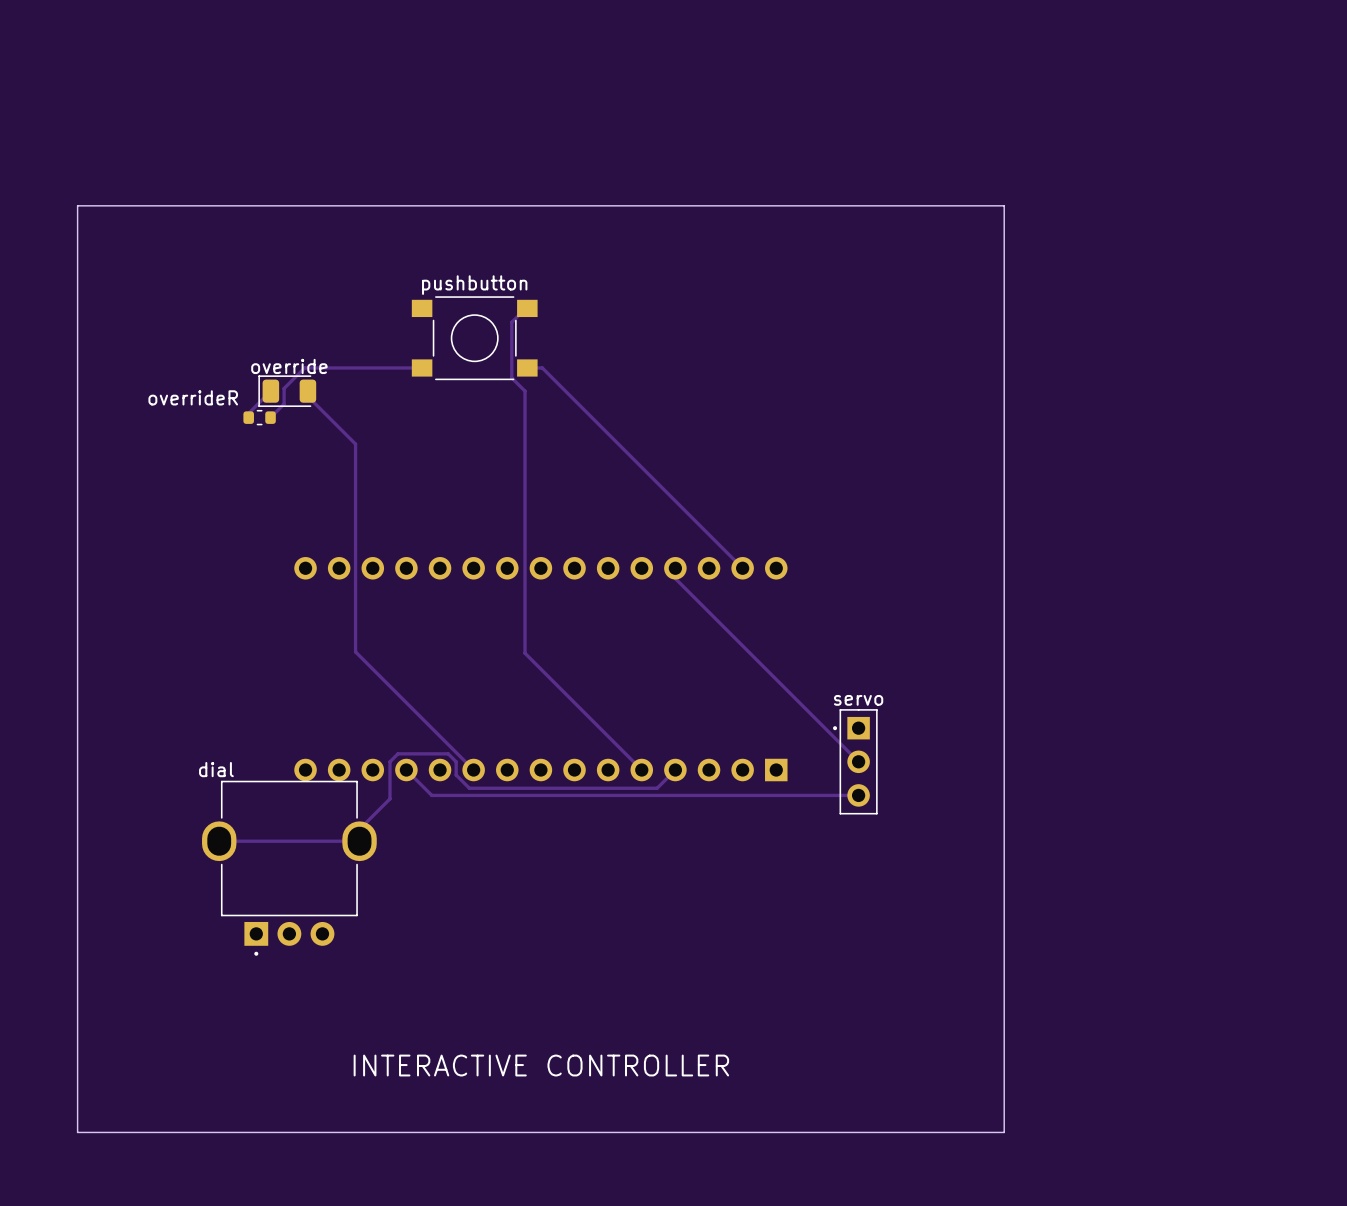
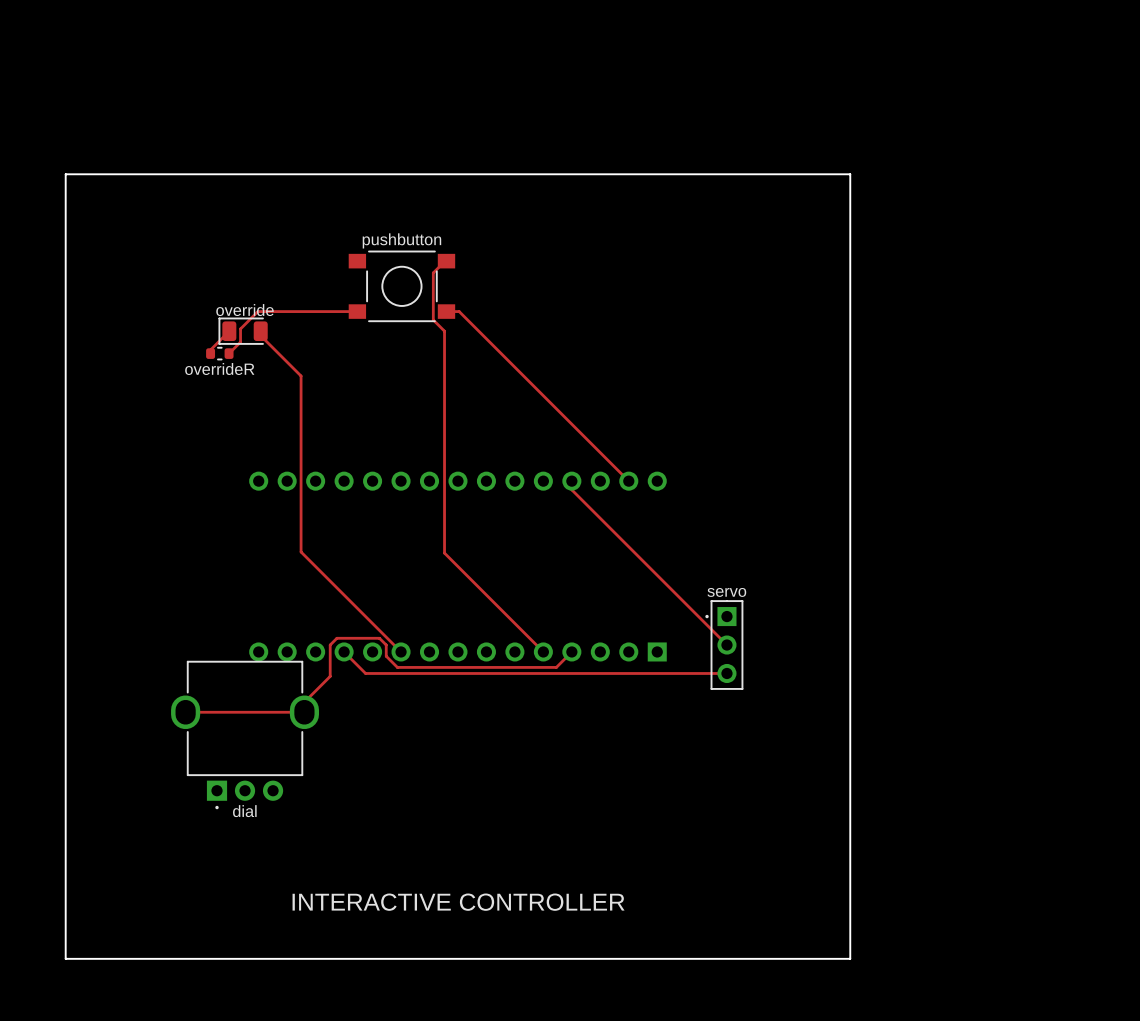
overrideR name position: overrideR (193, 397) -> overrideR (219, 368)
dial name position: dial (216, 769) -> dial (244, 811)

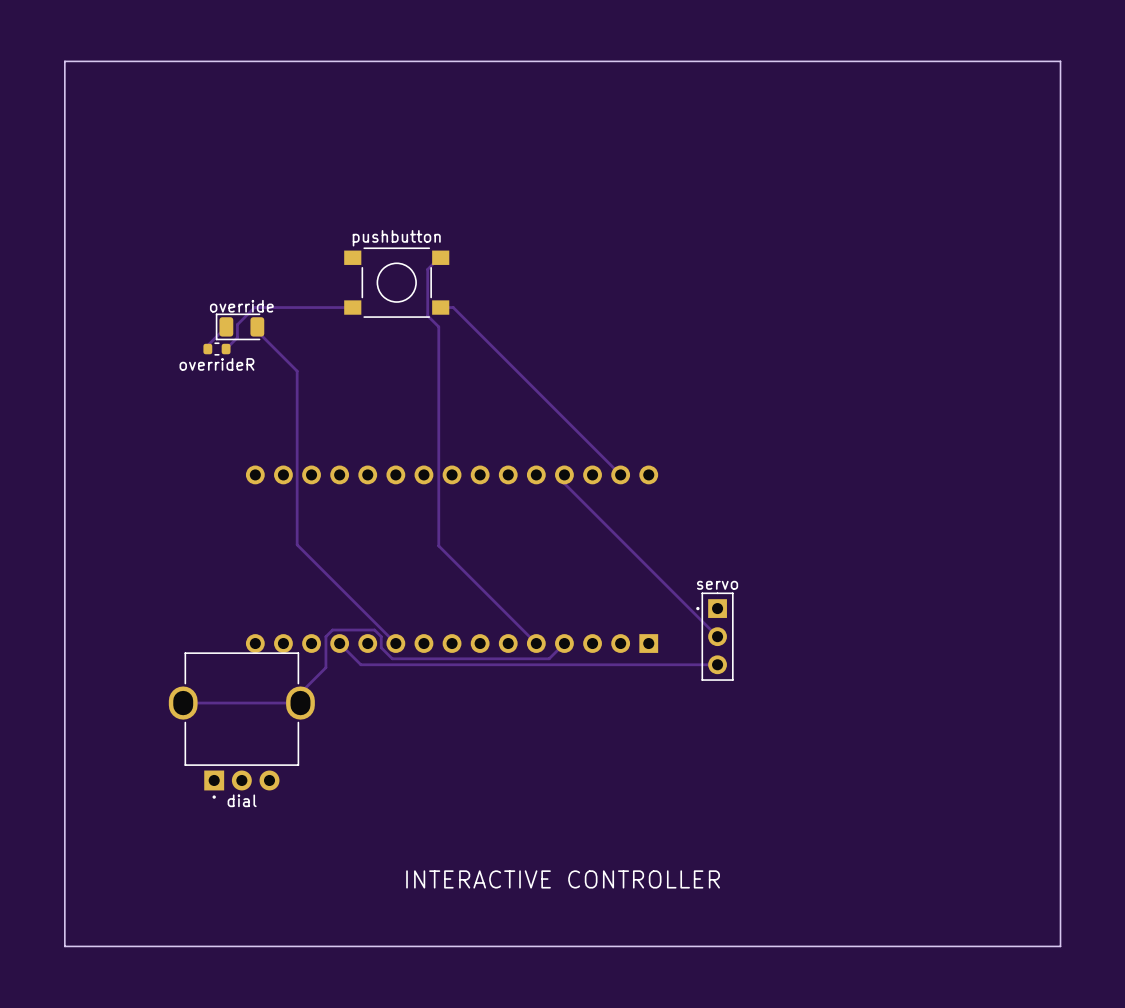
board edge: (65, 174) (850, 174) (850, 958) -> (64, 172) (64, 61) (1060, 61) (1060, 946) (839, 946)
text position: INTERACTIVE CONTROLLER (458, 902) -> INTERACTIVE CONTROLLER (563, 879)

